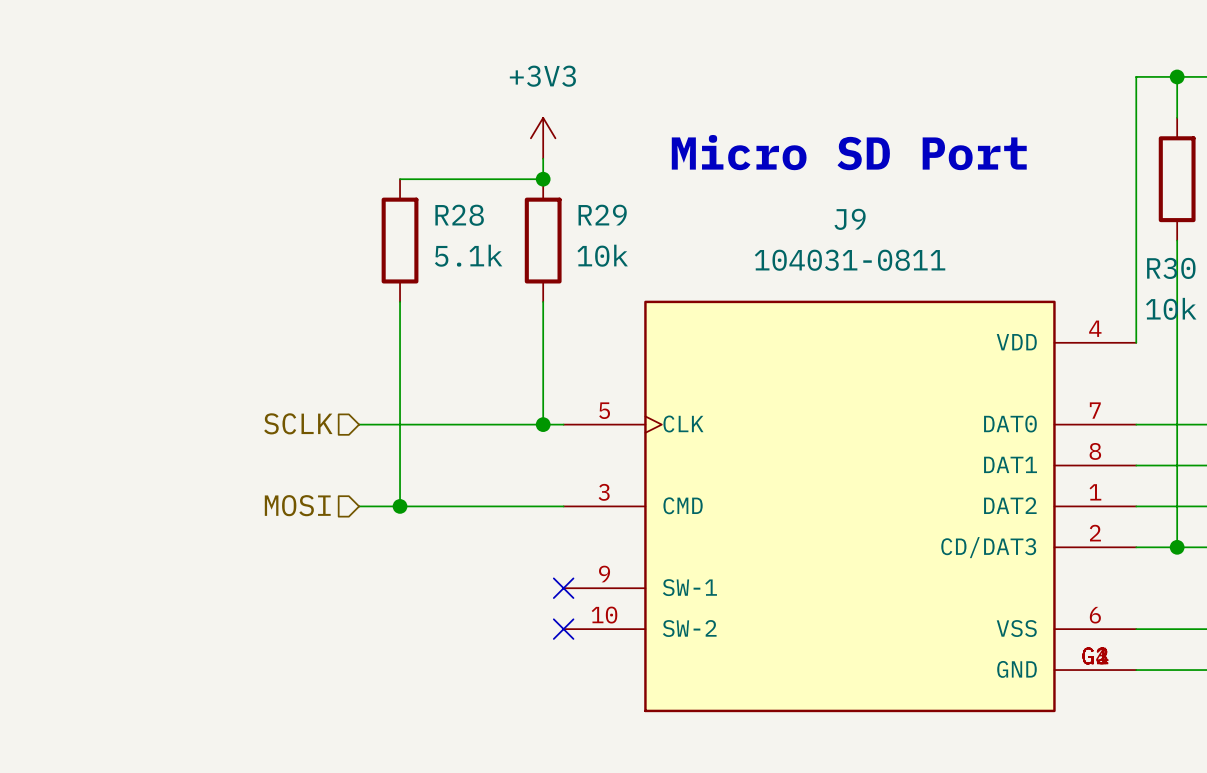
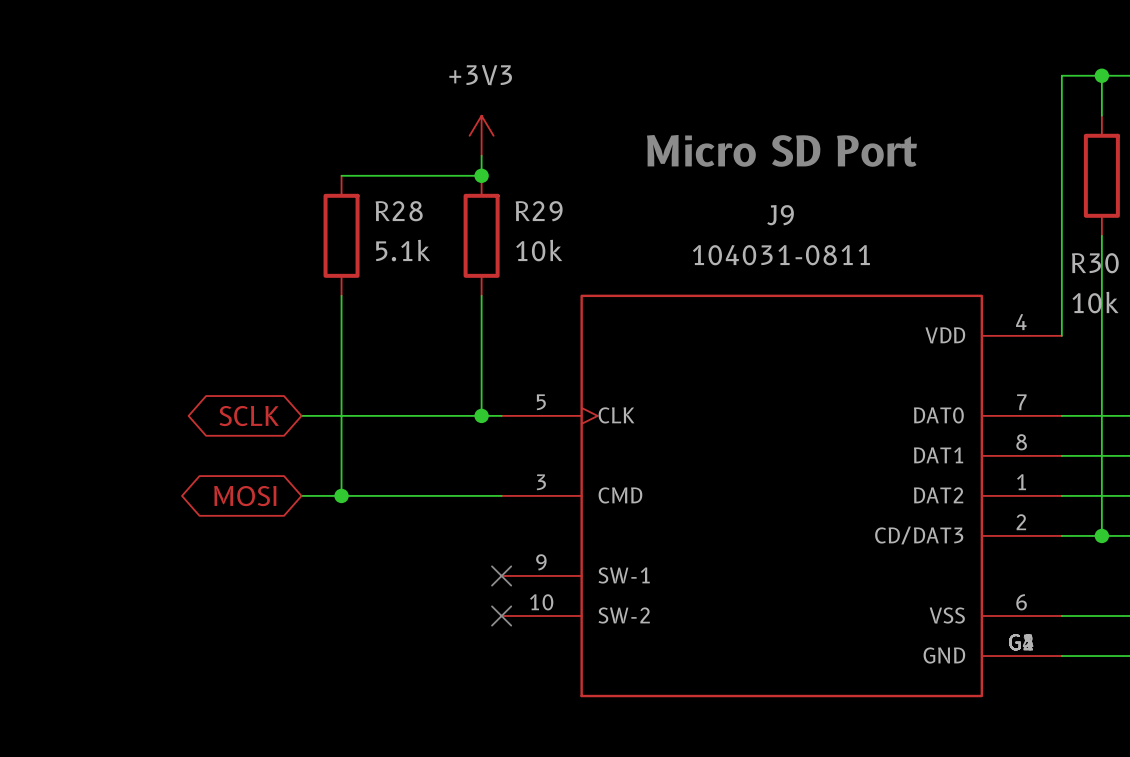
hierarchical label: SCLK (298, 423) -> none
global label: none -> SCLK (249, 416)
hierarchical label: MOSI (297, 505) -> none
global label: none -> MOSI (245, 496)

